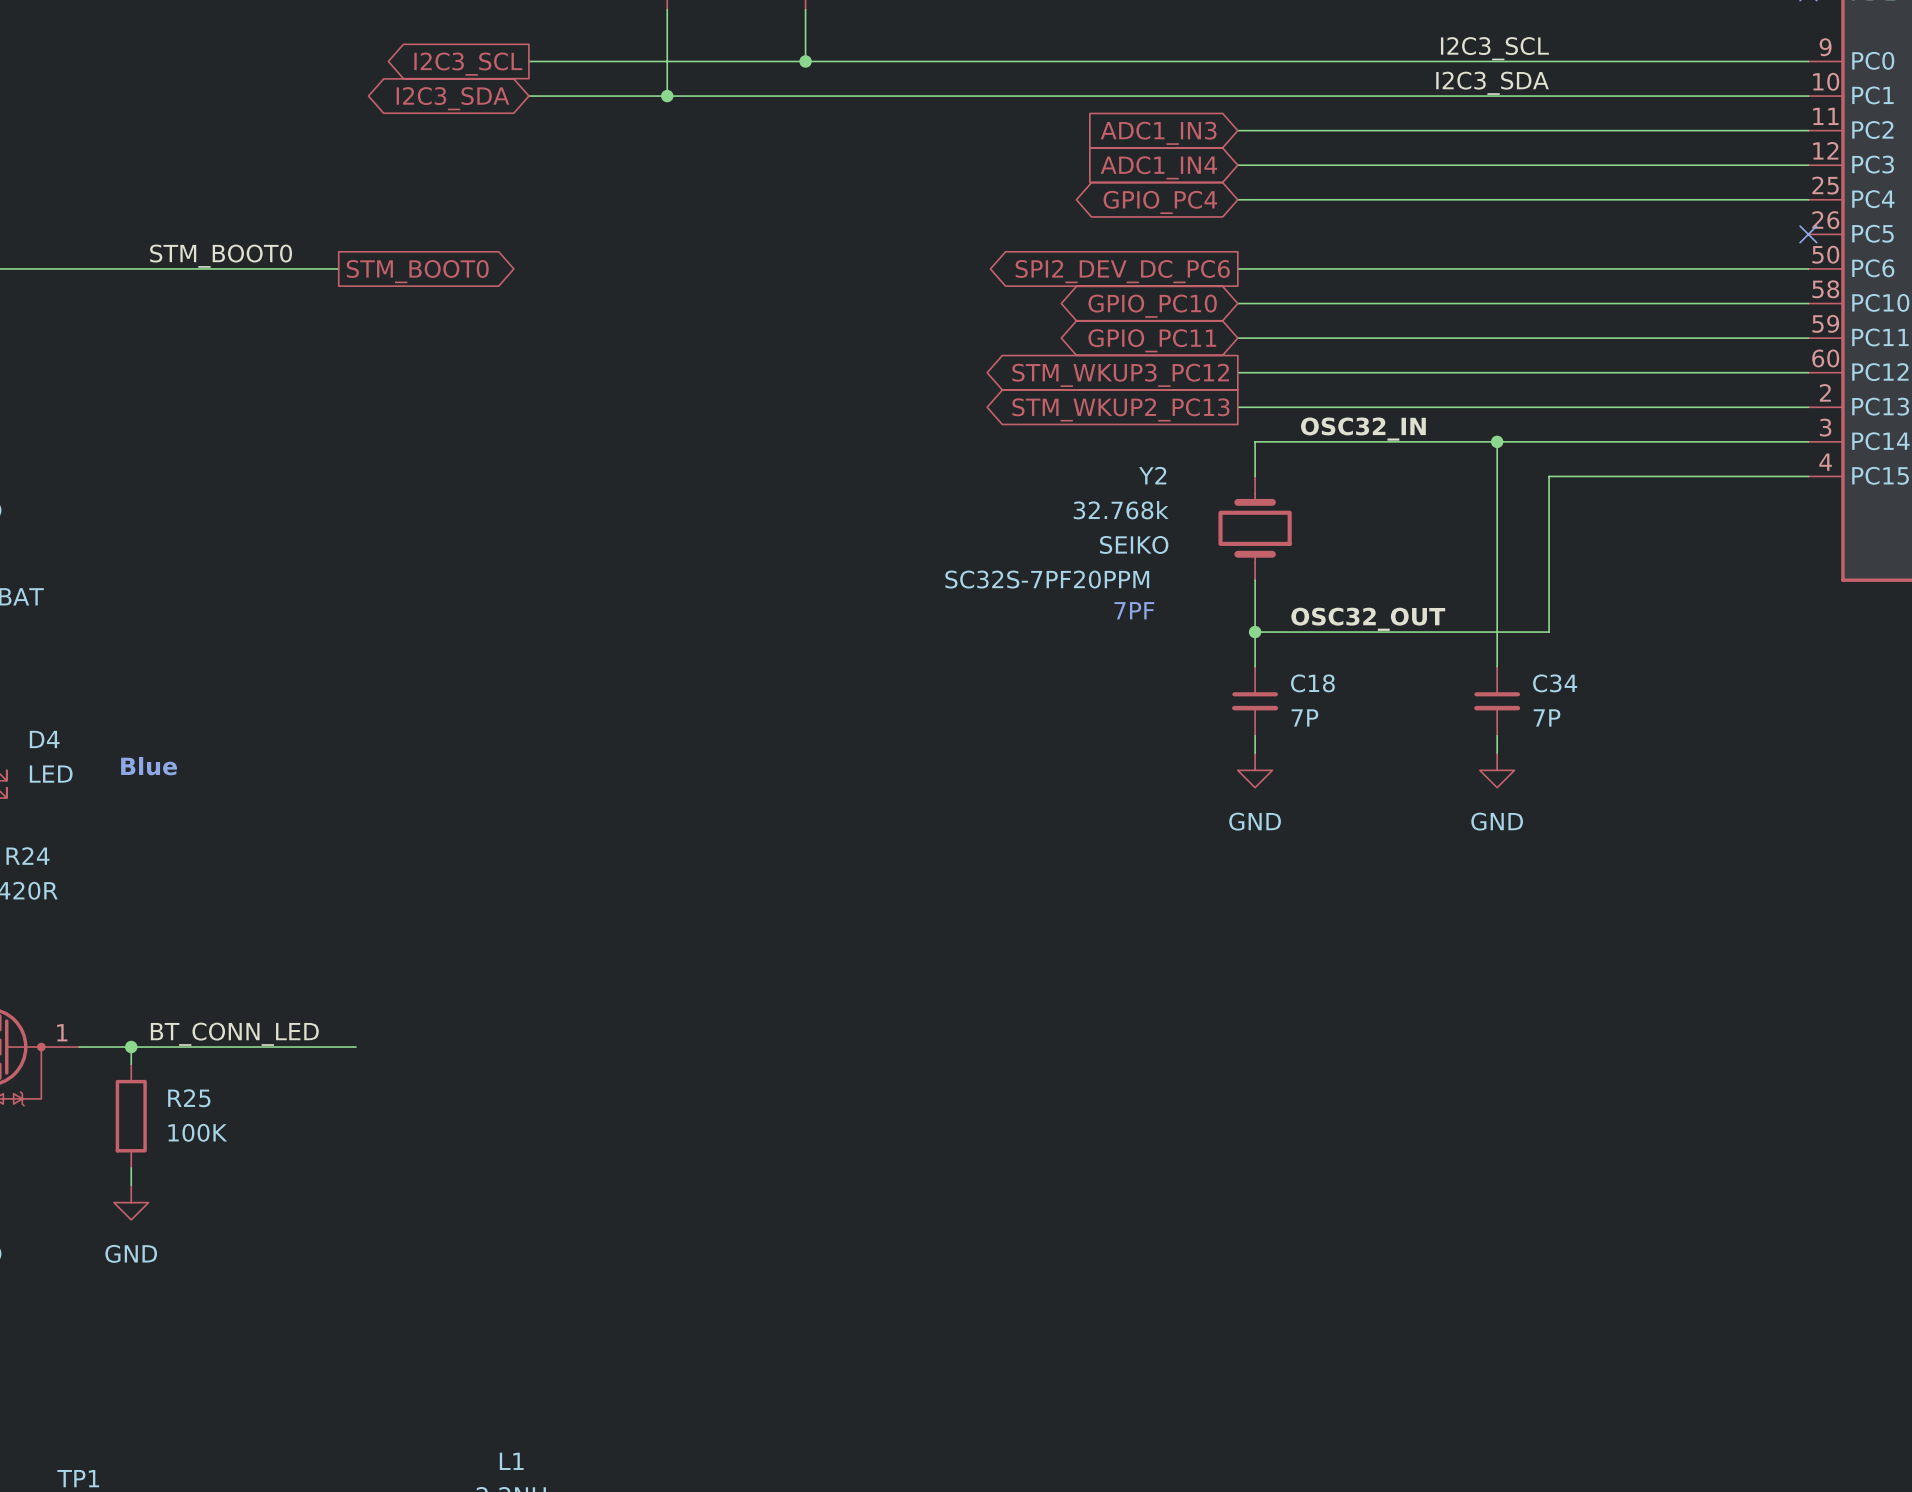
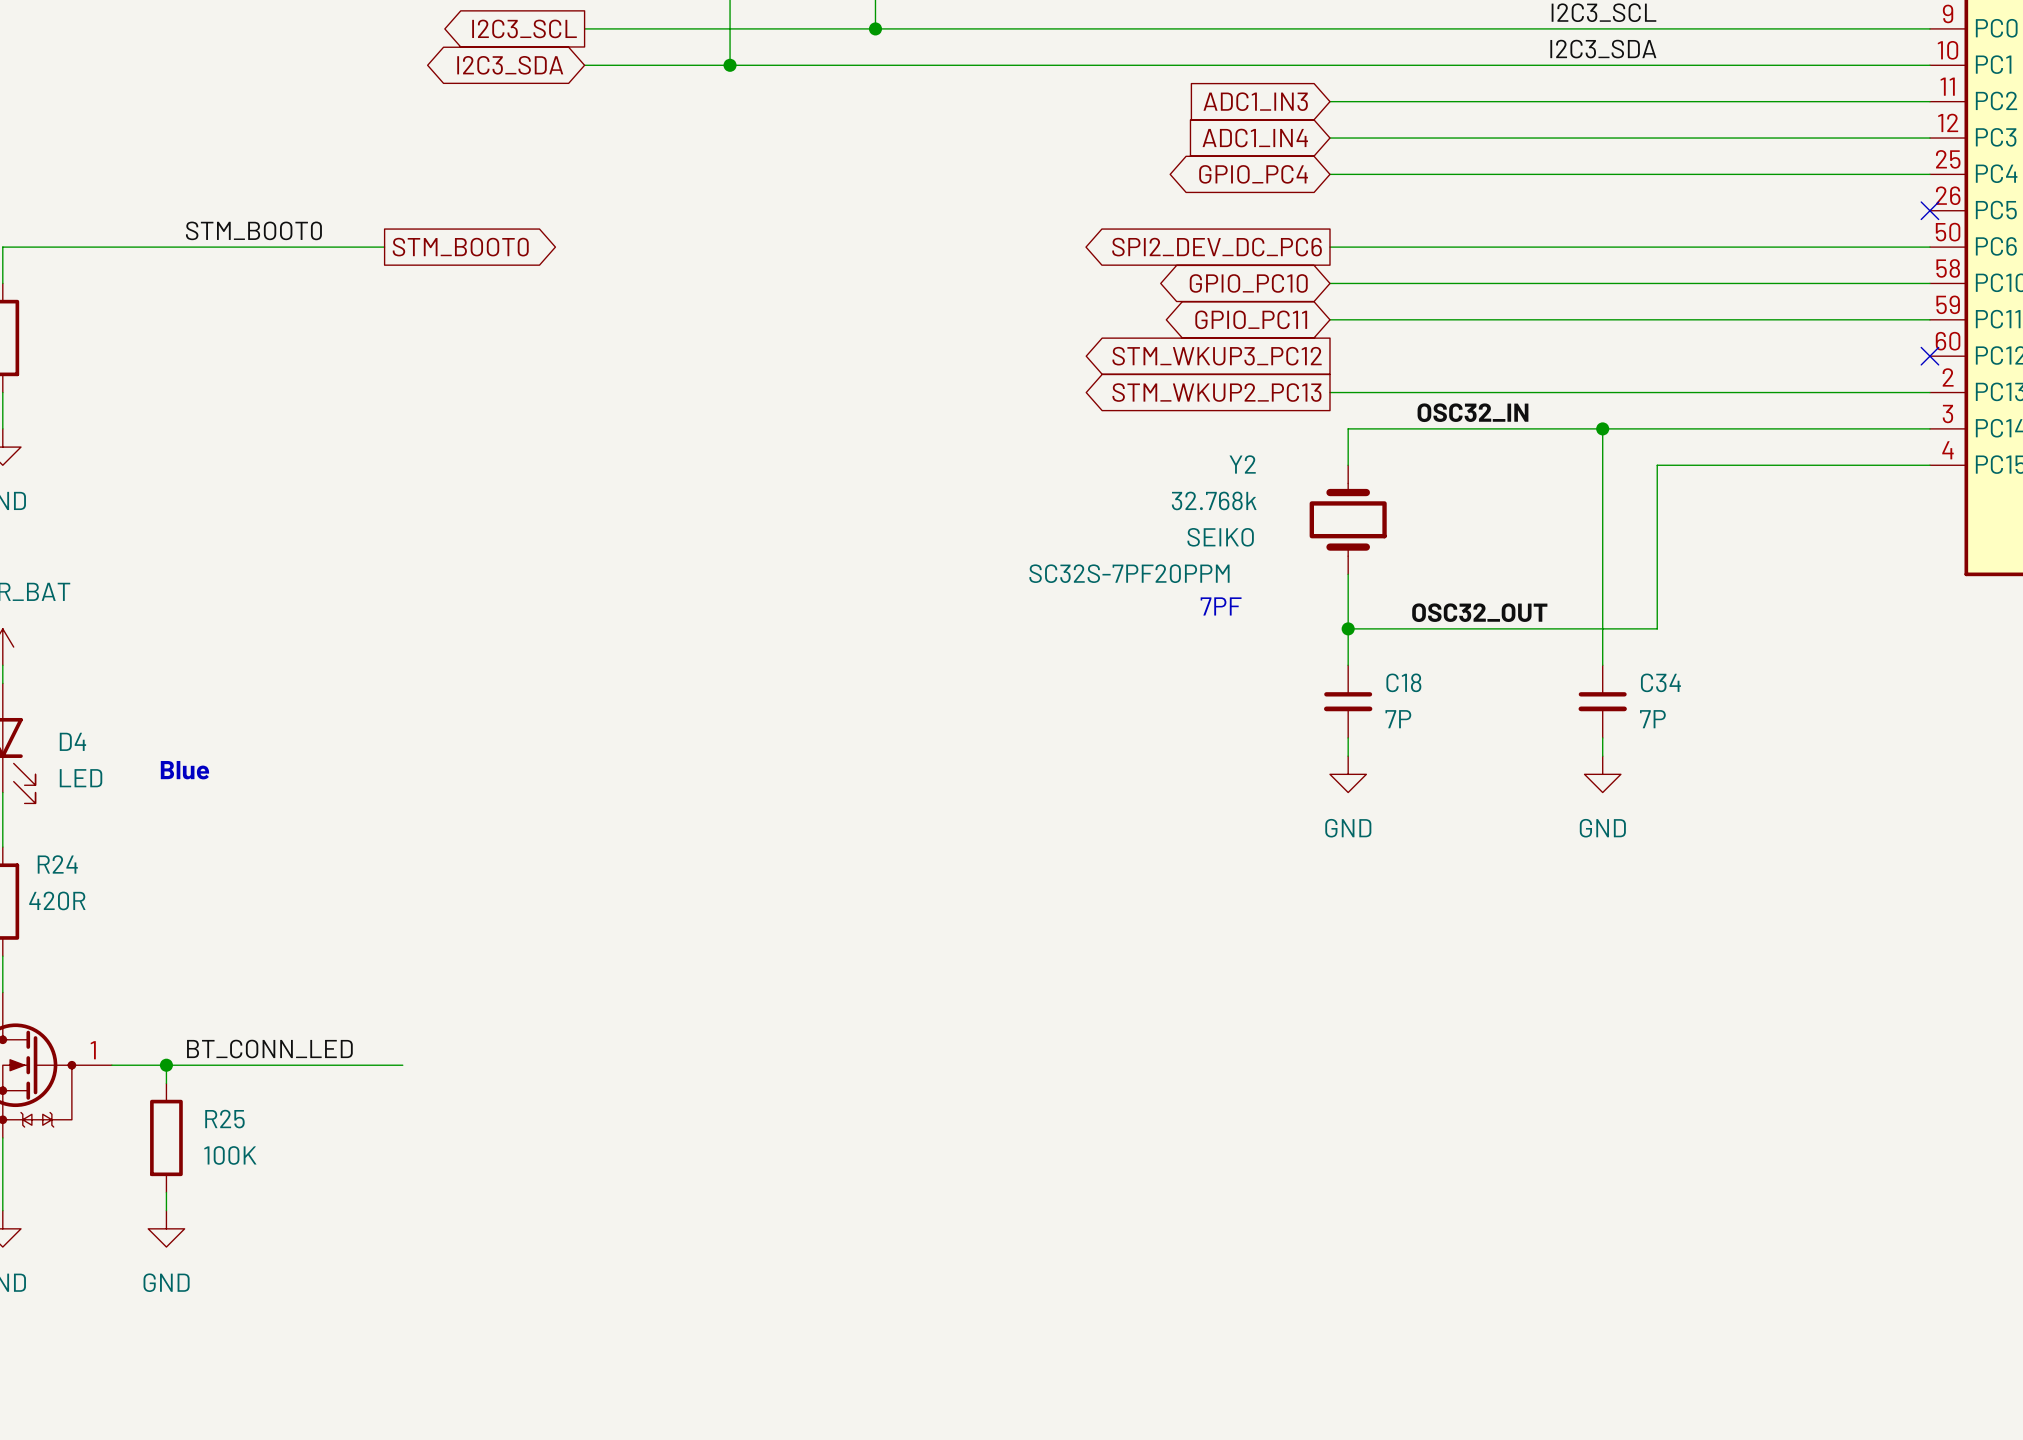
wire: (1237, 372) (1808, 372) -> none
no-connect mark: none -> (1929, 356)

